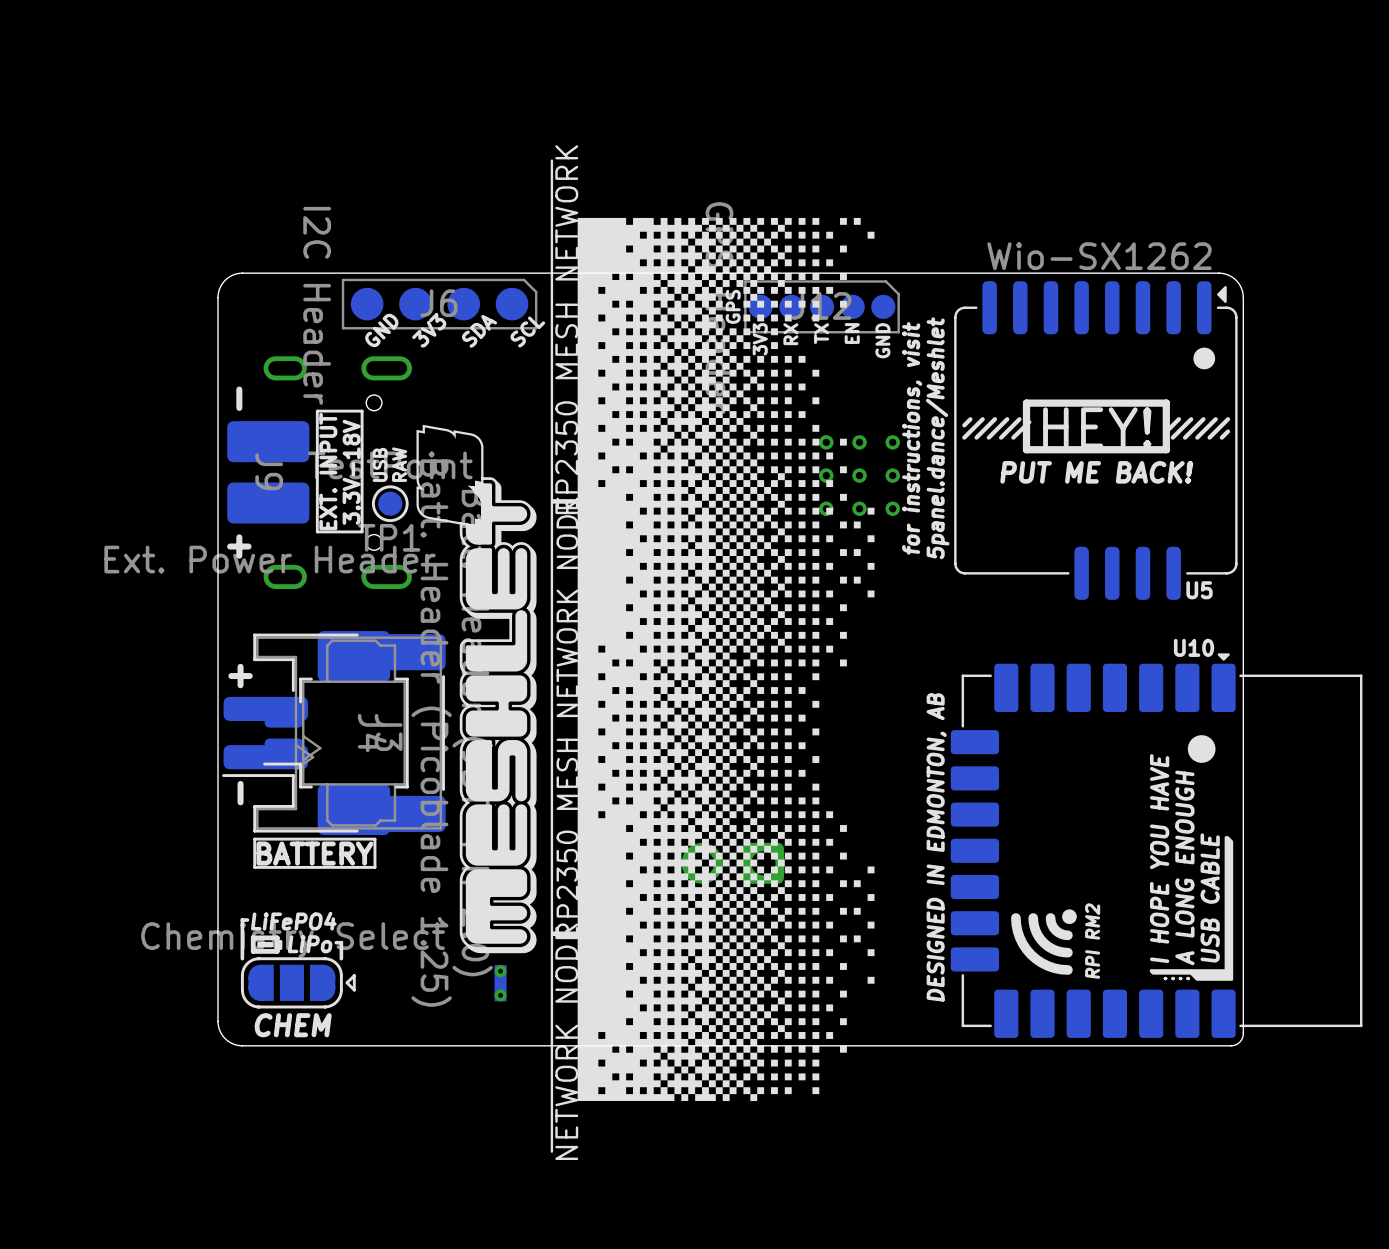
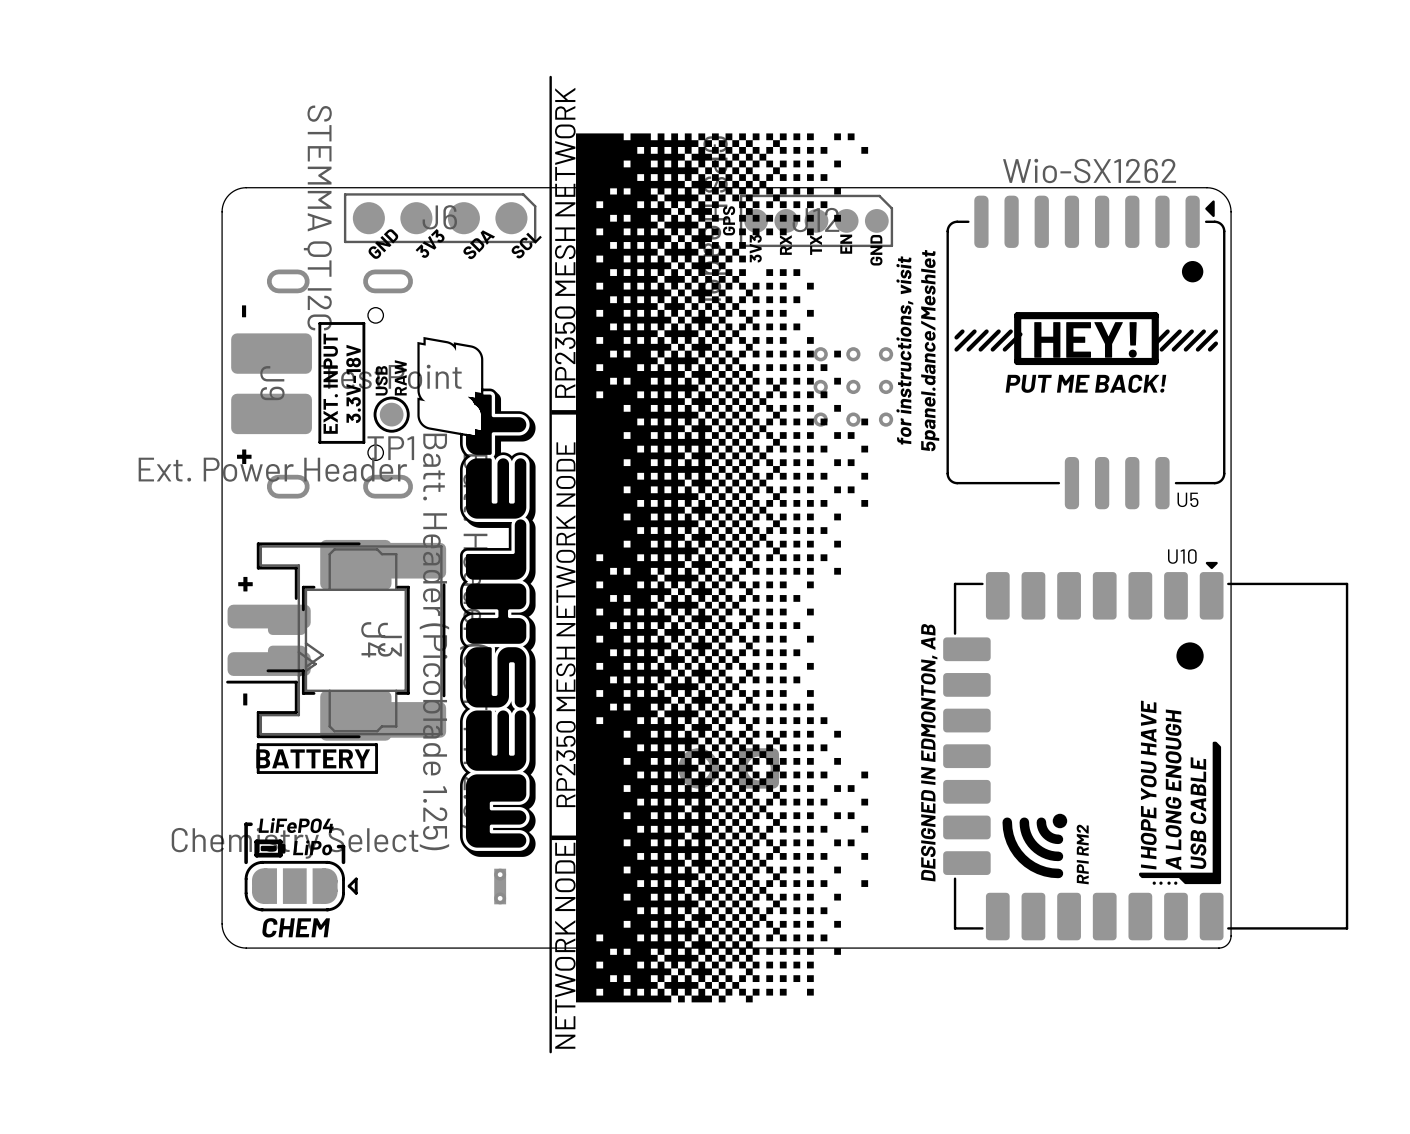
J6 value: I2C Header (317, 305) -> STEMMA QT I2C (317, 217)
drawing: [757, 328, 778, 363] -> none

